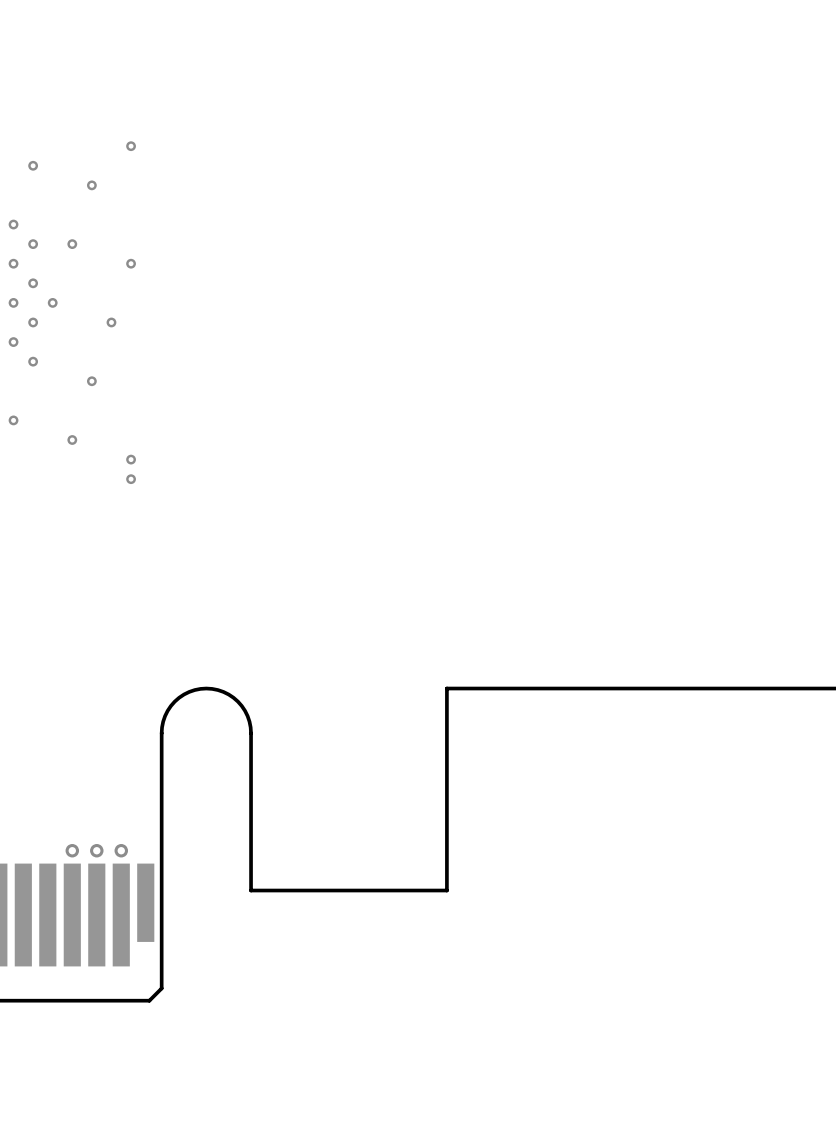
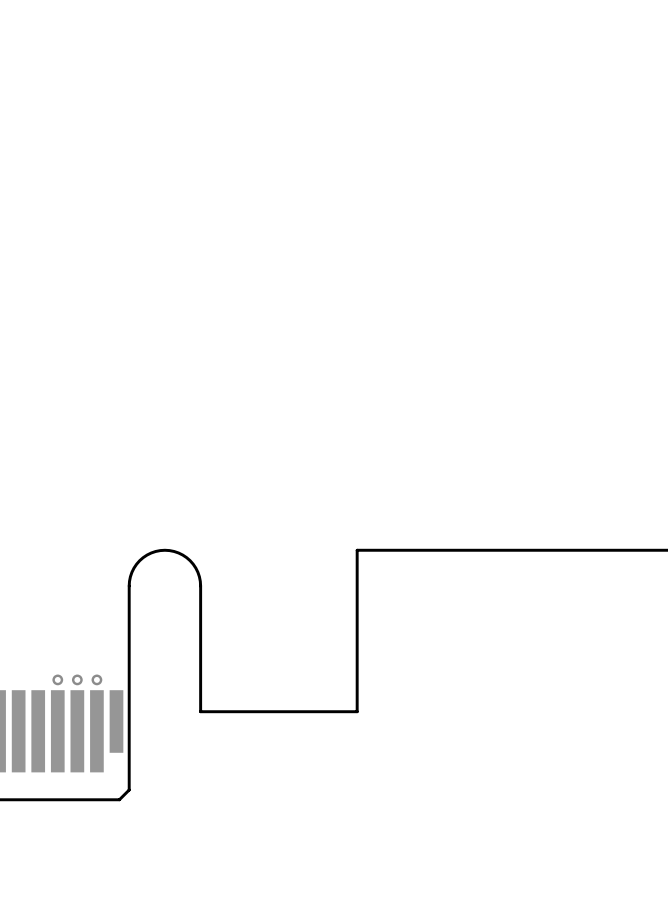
via: (131, 146) -> none
via: (33, 165) -> none
via: (91, 185) -> none
via: (13, 224) -> none
via: (33, 244) -> none
via: (72, 244) -> none
via: (13, 263) -> none
via: (131, 263) -> none
via: (33, 283) -> none
via: (13, 302) -> none
via: (52, 302) -> none
via: (33, 322) -> none
via: (111, 322) -> none
via: (13, 342) -> none
via: (33, 361) -> none
via: (91, 381) -> none
via: (13, 420) -> none
via: (72, 440) -> none
via: (131, 459) -> none
via: (131, 479) -> none

